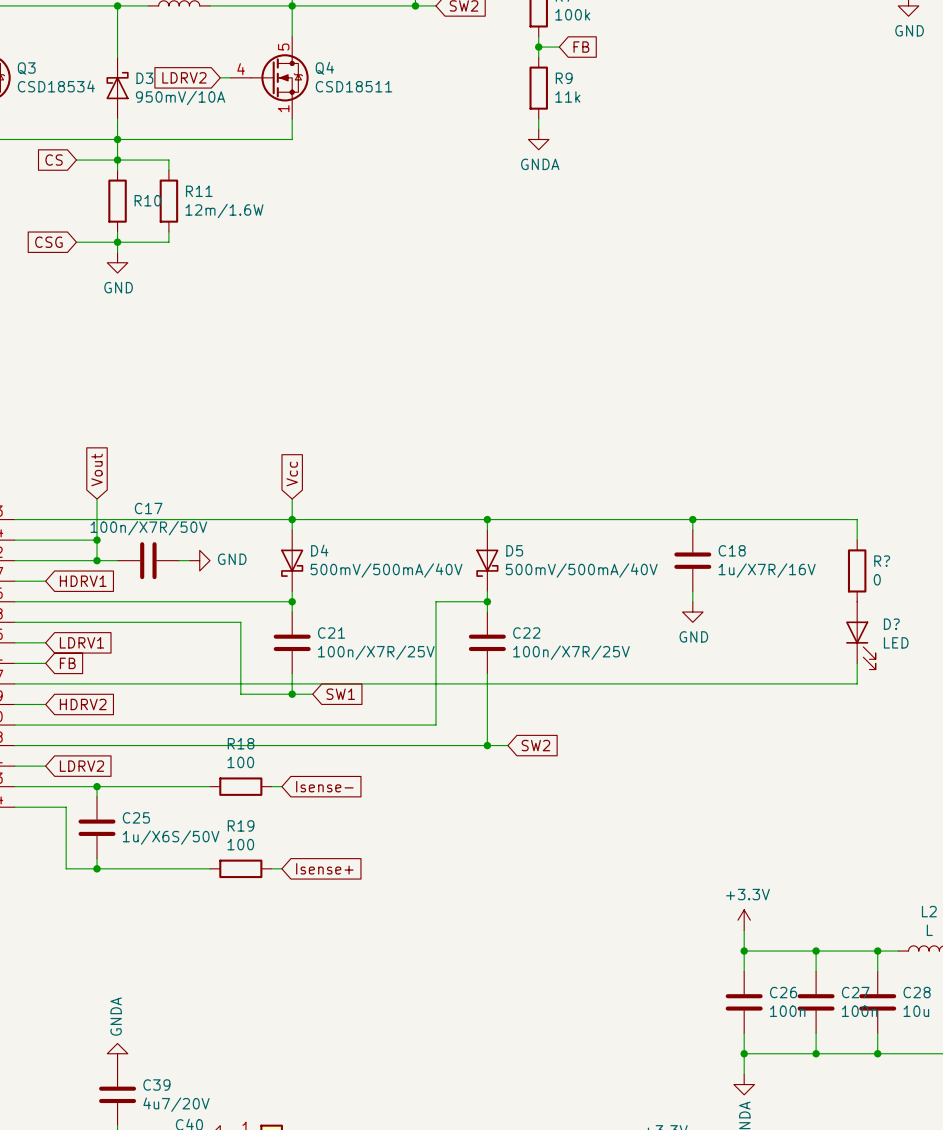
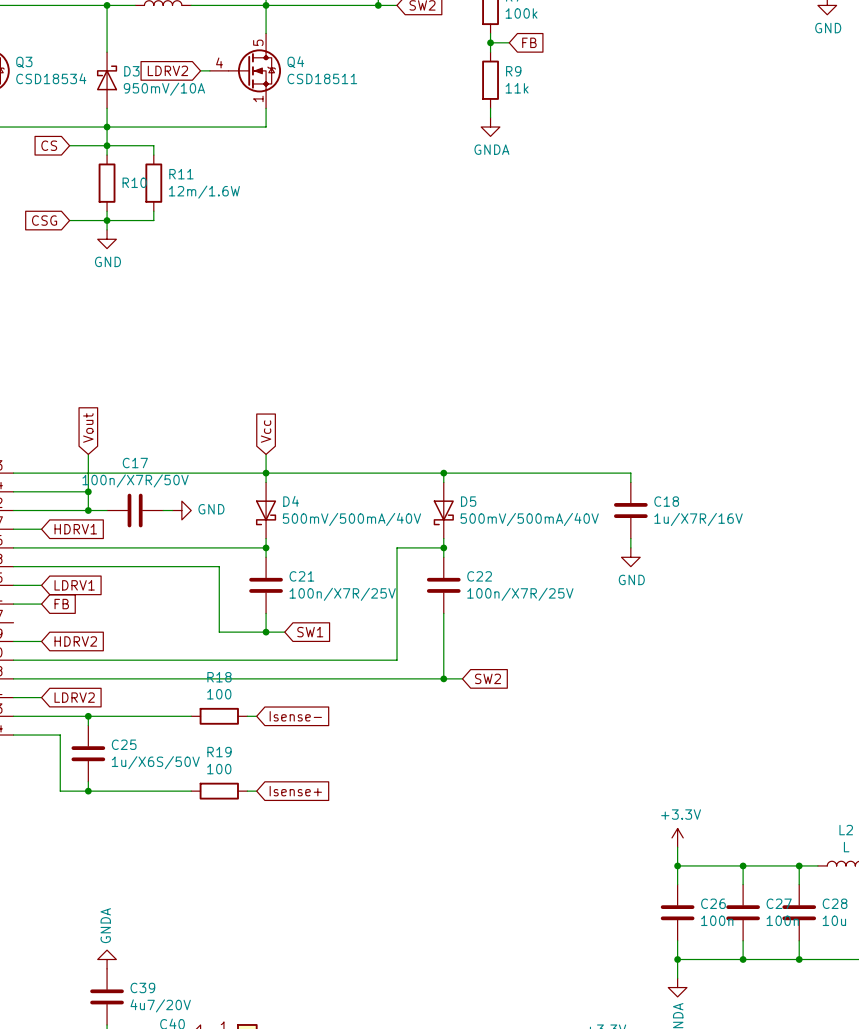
wire: (692, 519) (857, 519) (857, 540) -> none
junction: (692, 519) -> none
R?: 0 (857, 570) -> none
D?: LED (860, 635) -> none
wire: (857, 663) (857, 683) (14, 683) -> none

